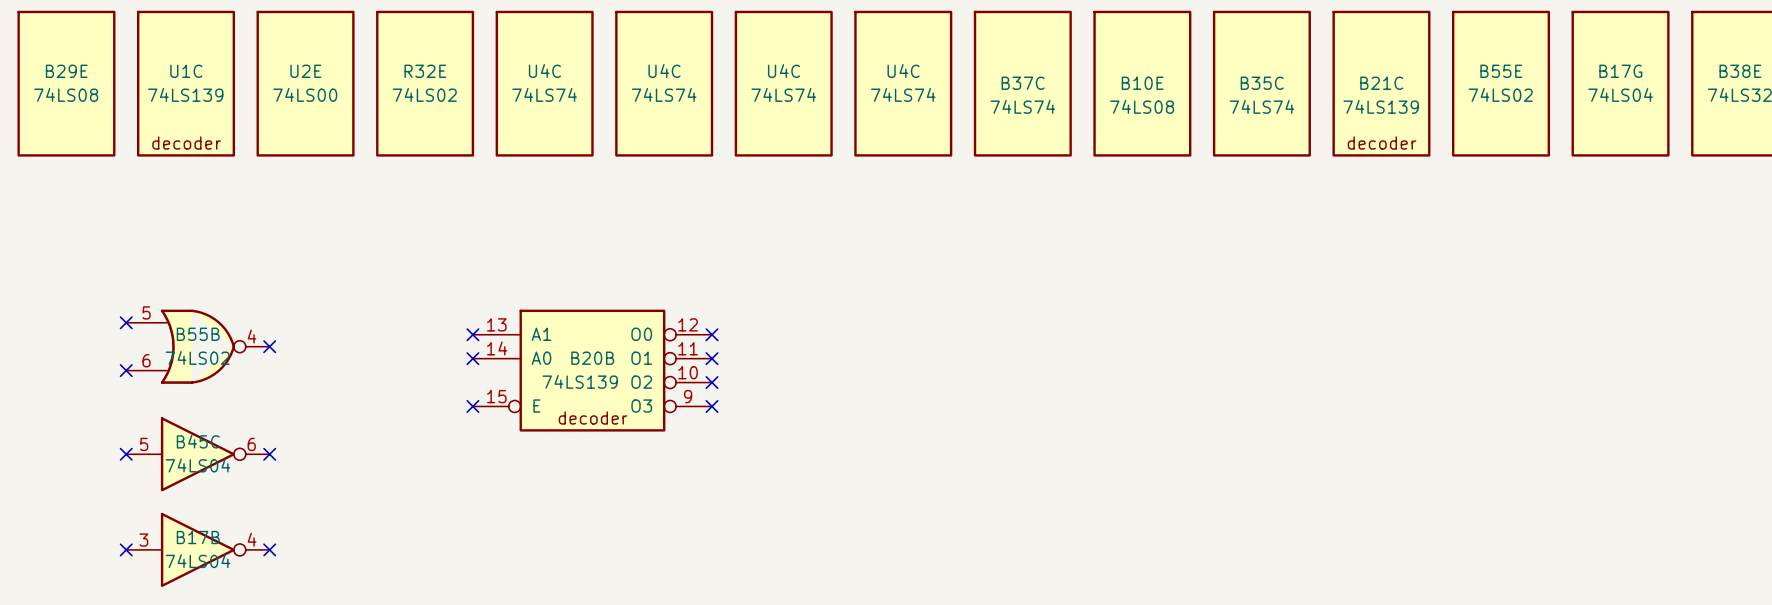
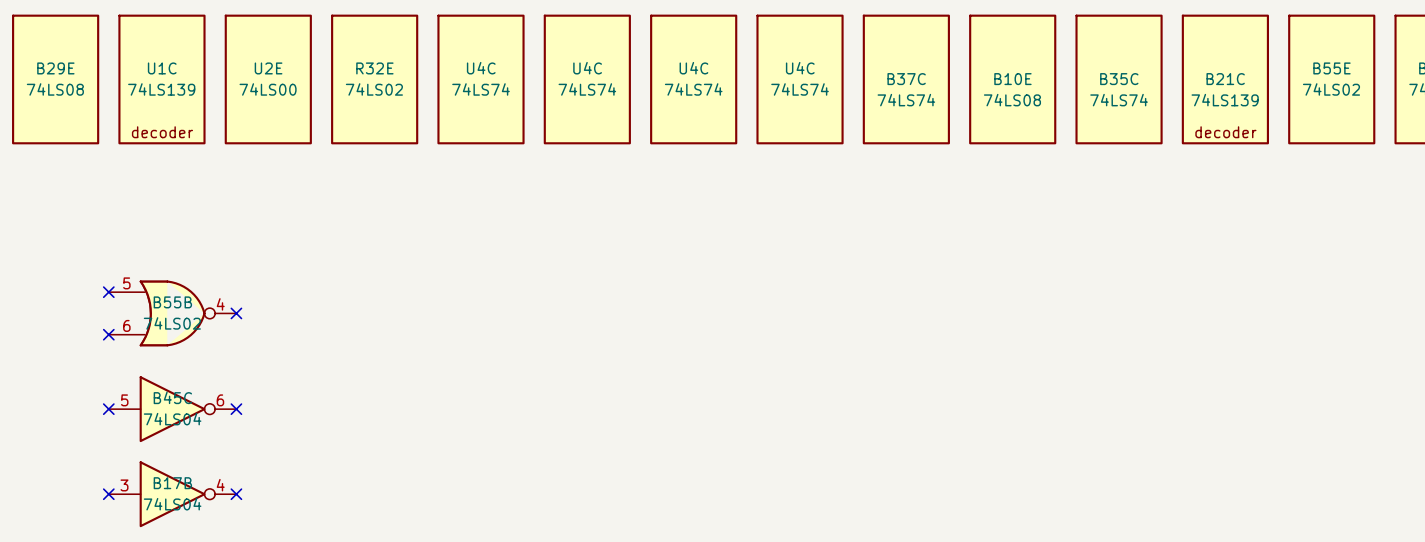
no-connect mark: (472, 334) -> none
no-connect mark: (712, 334) -> none
no-connect mark: (472, 358) -> none
no-connect mark: (712, 358) -> none
B20B: 74LS139 (592, 370) -> none
no-connect mark: (712, 382) -> none
no-connect mark: (472, 406) -> none
no-connect mark: (712, 406) -> none

